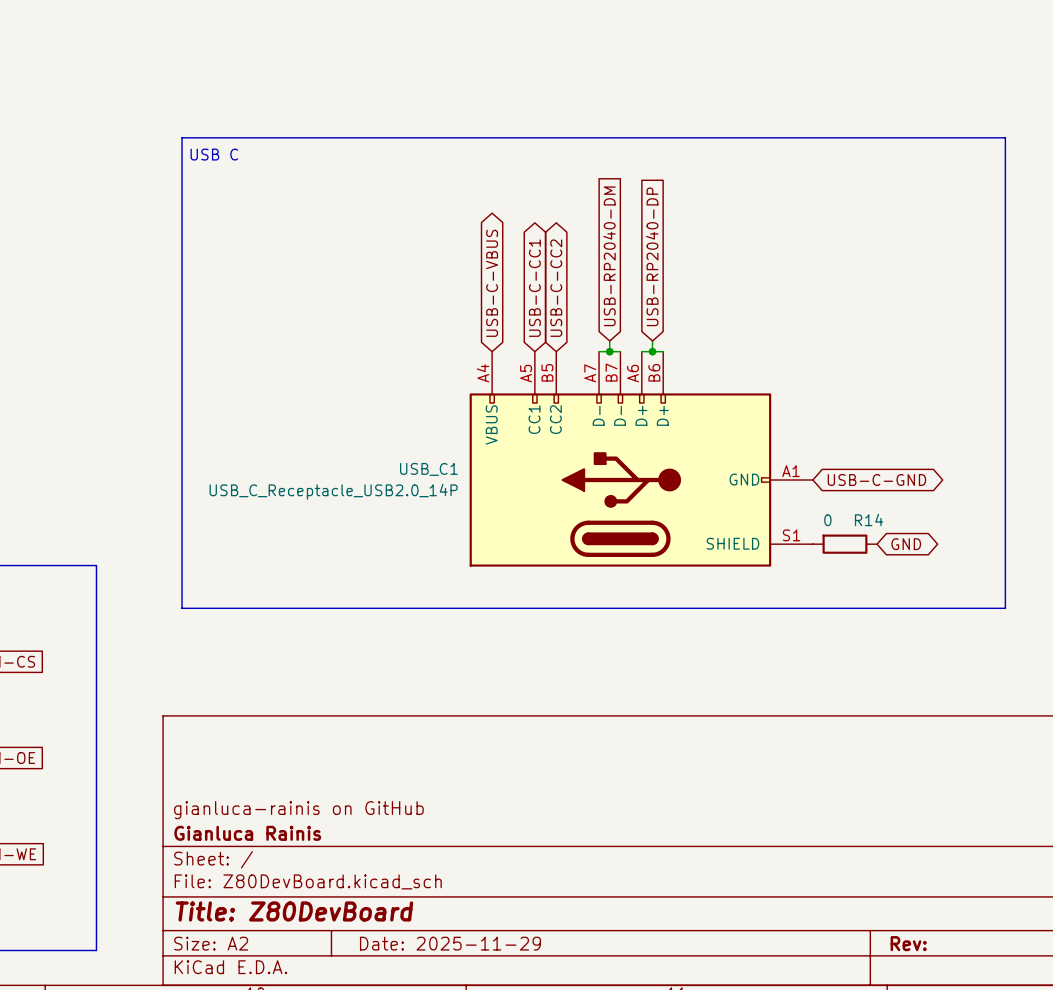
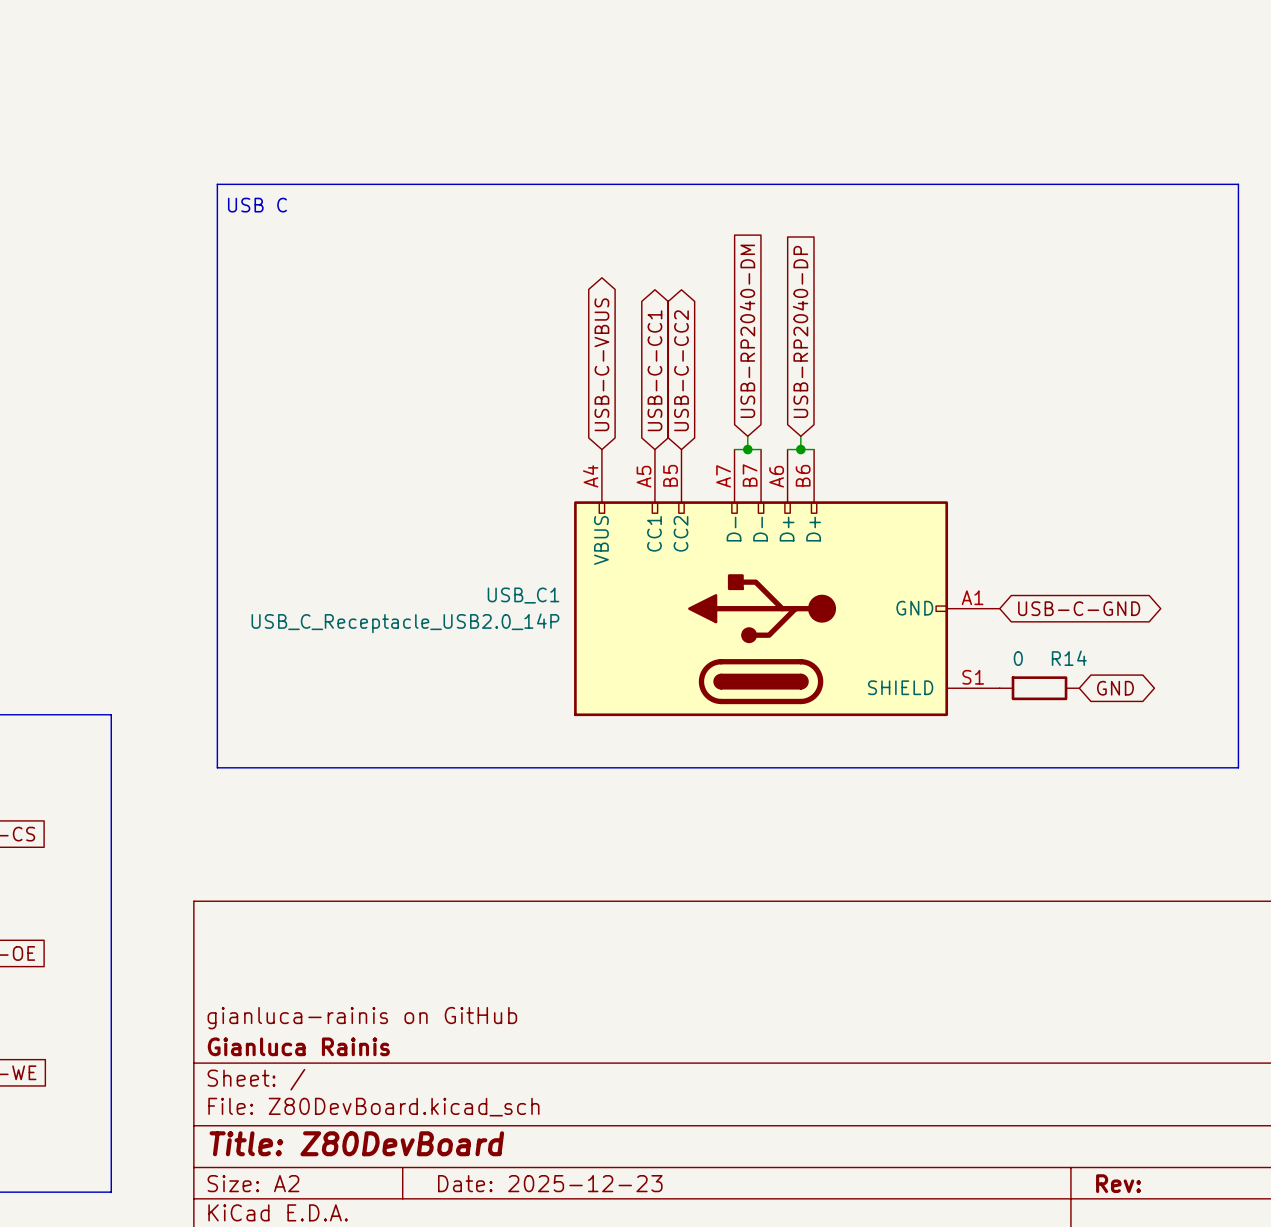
title block: Date: 2025-11-29 (450, 943) -> Date: 2025-12-23 (550, 1183)

